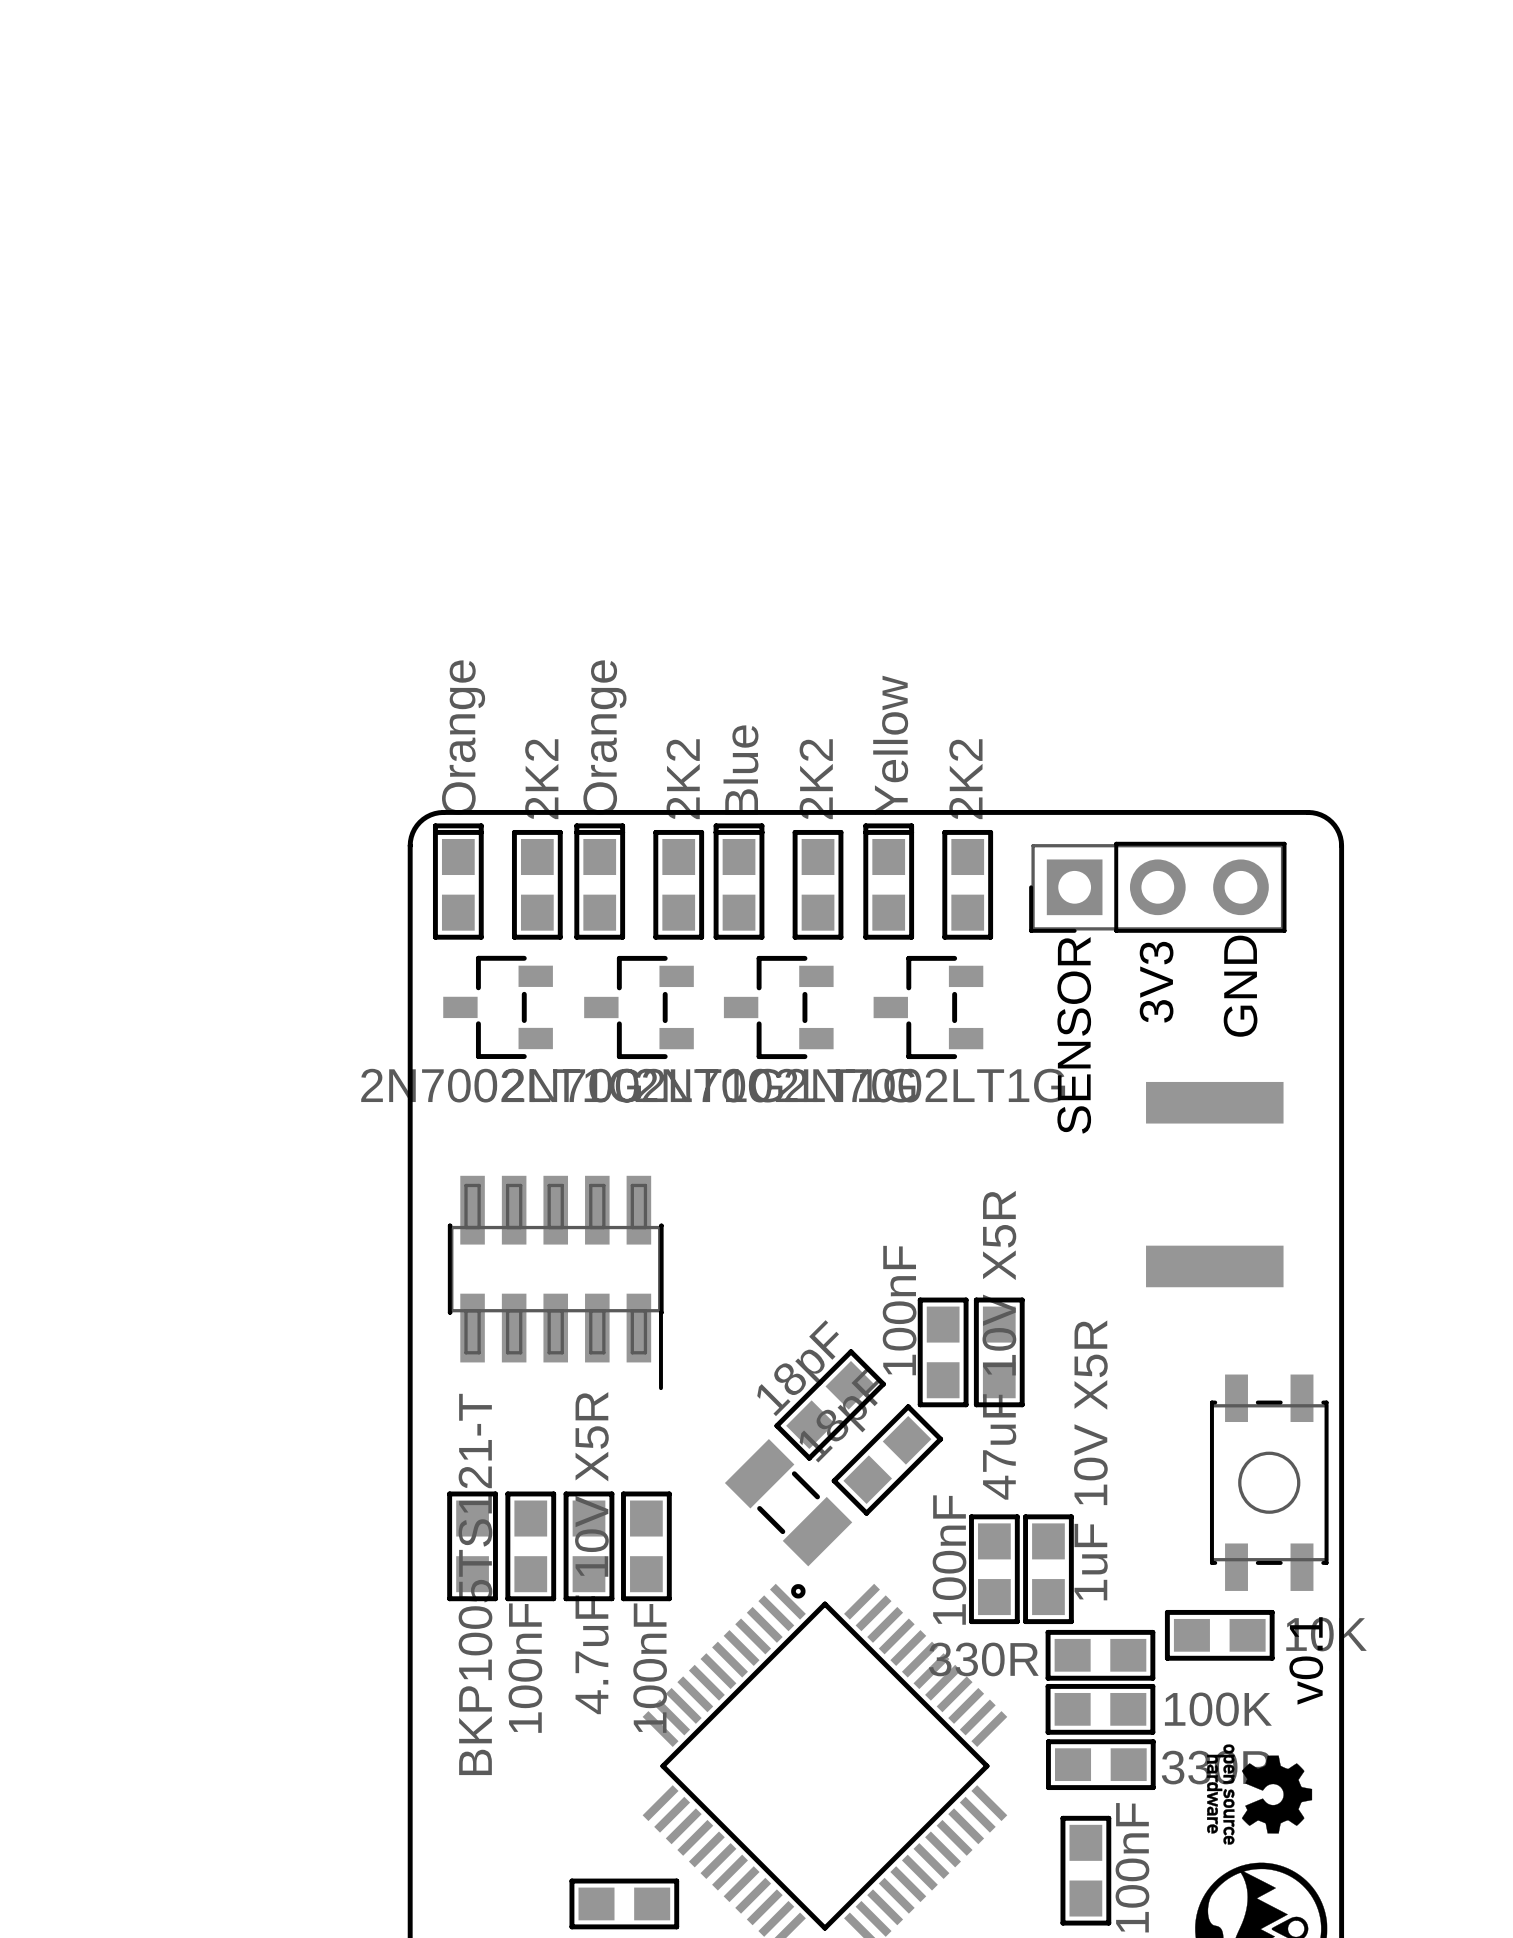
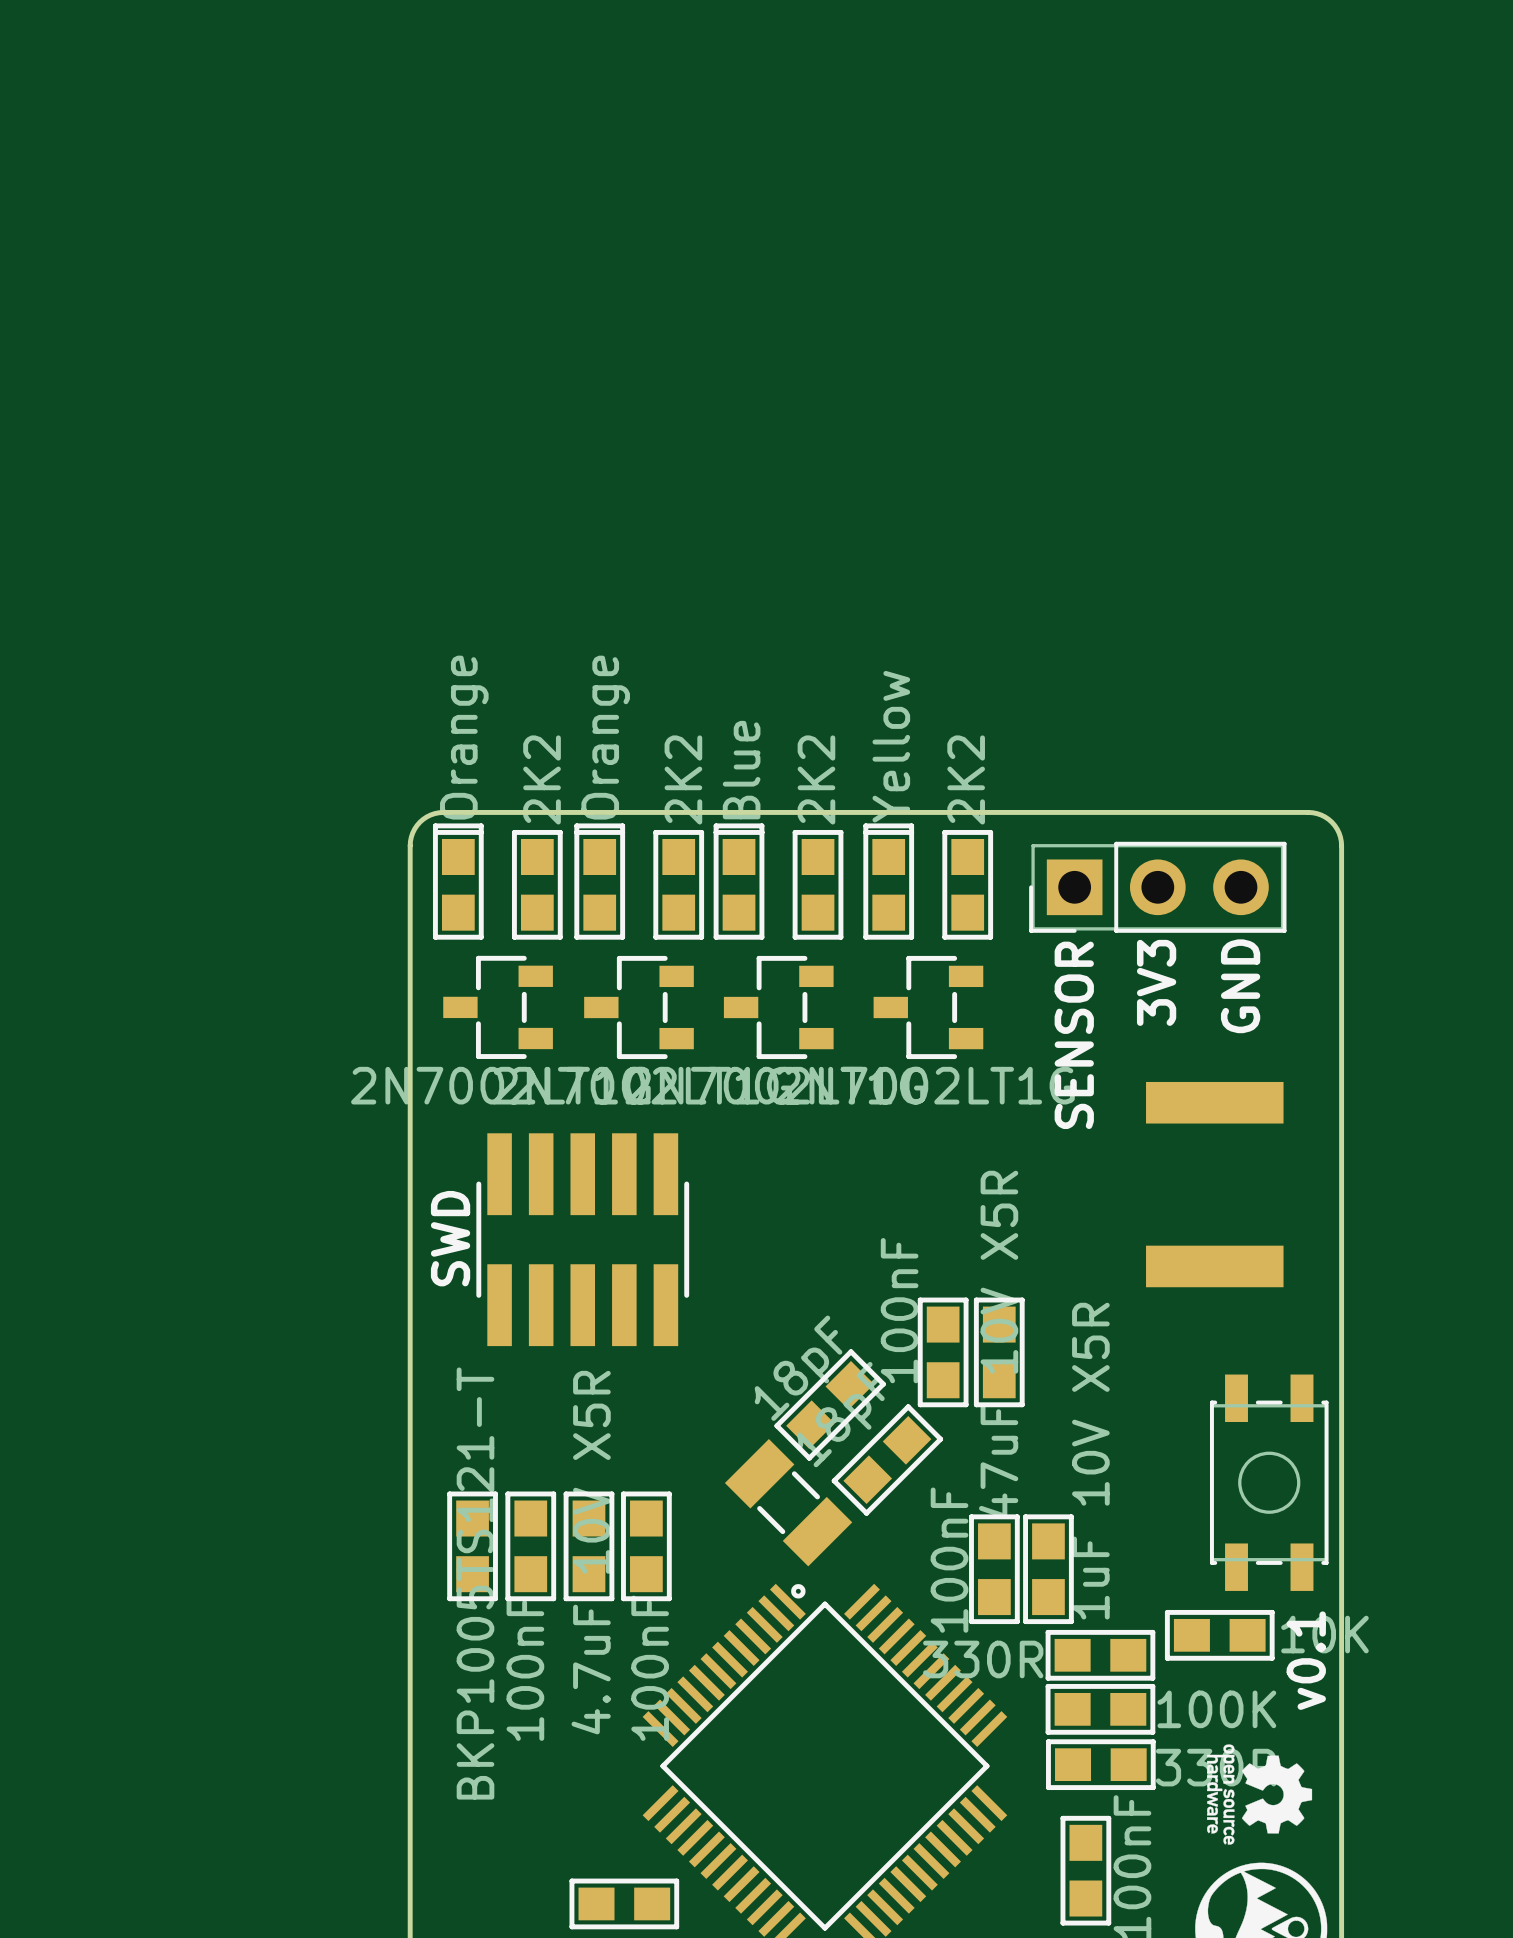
text: none -> SWD (450, 1238)
part: none -> (582, 1239)
part: (555, 1282) -> none

